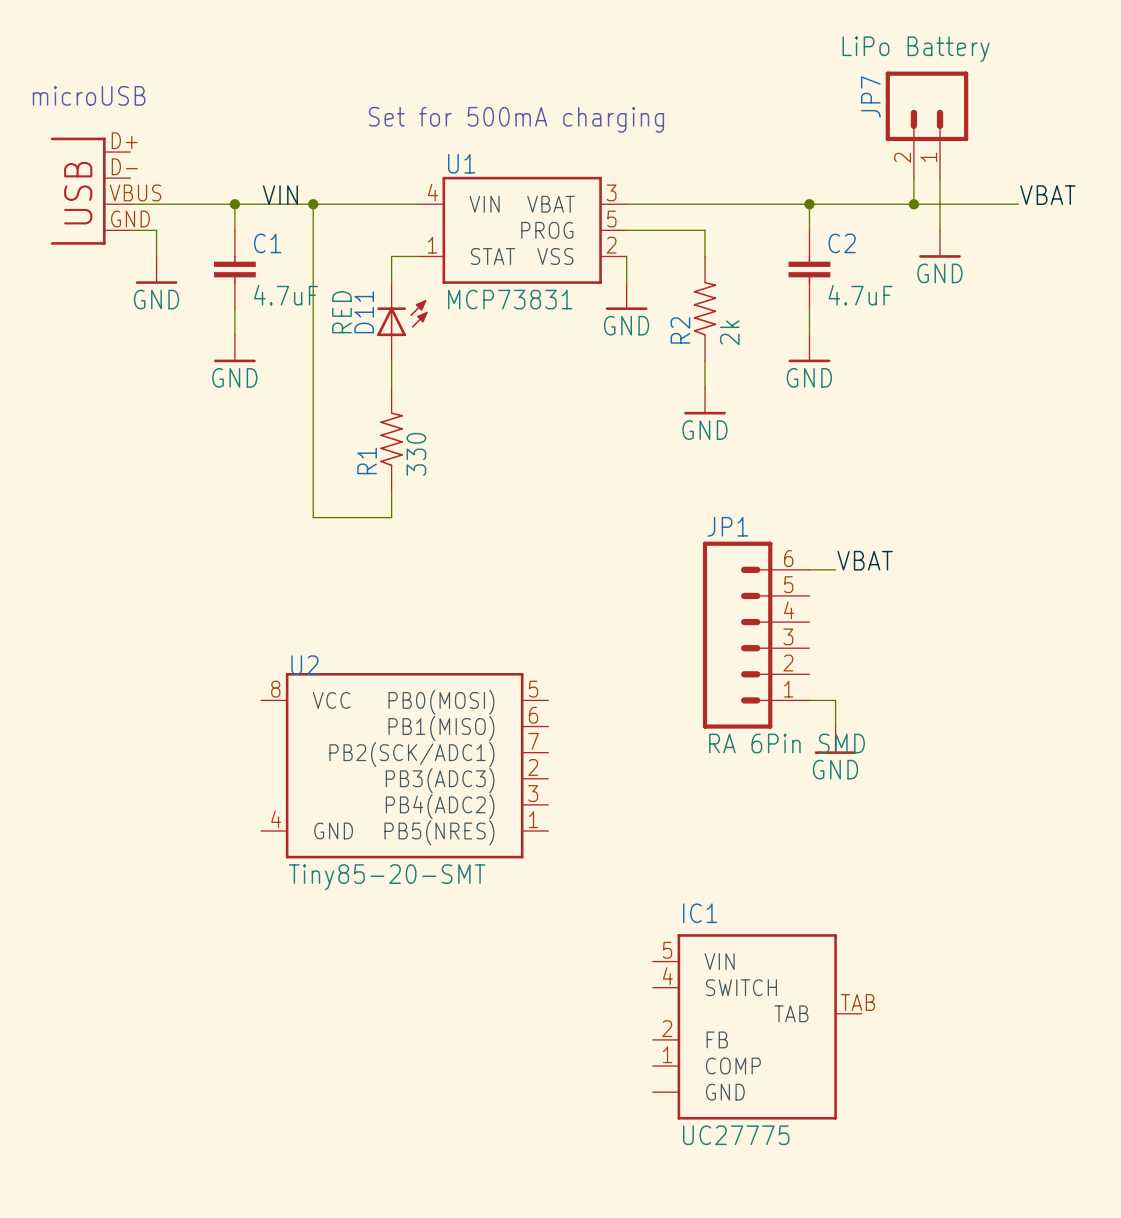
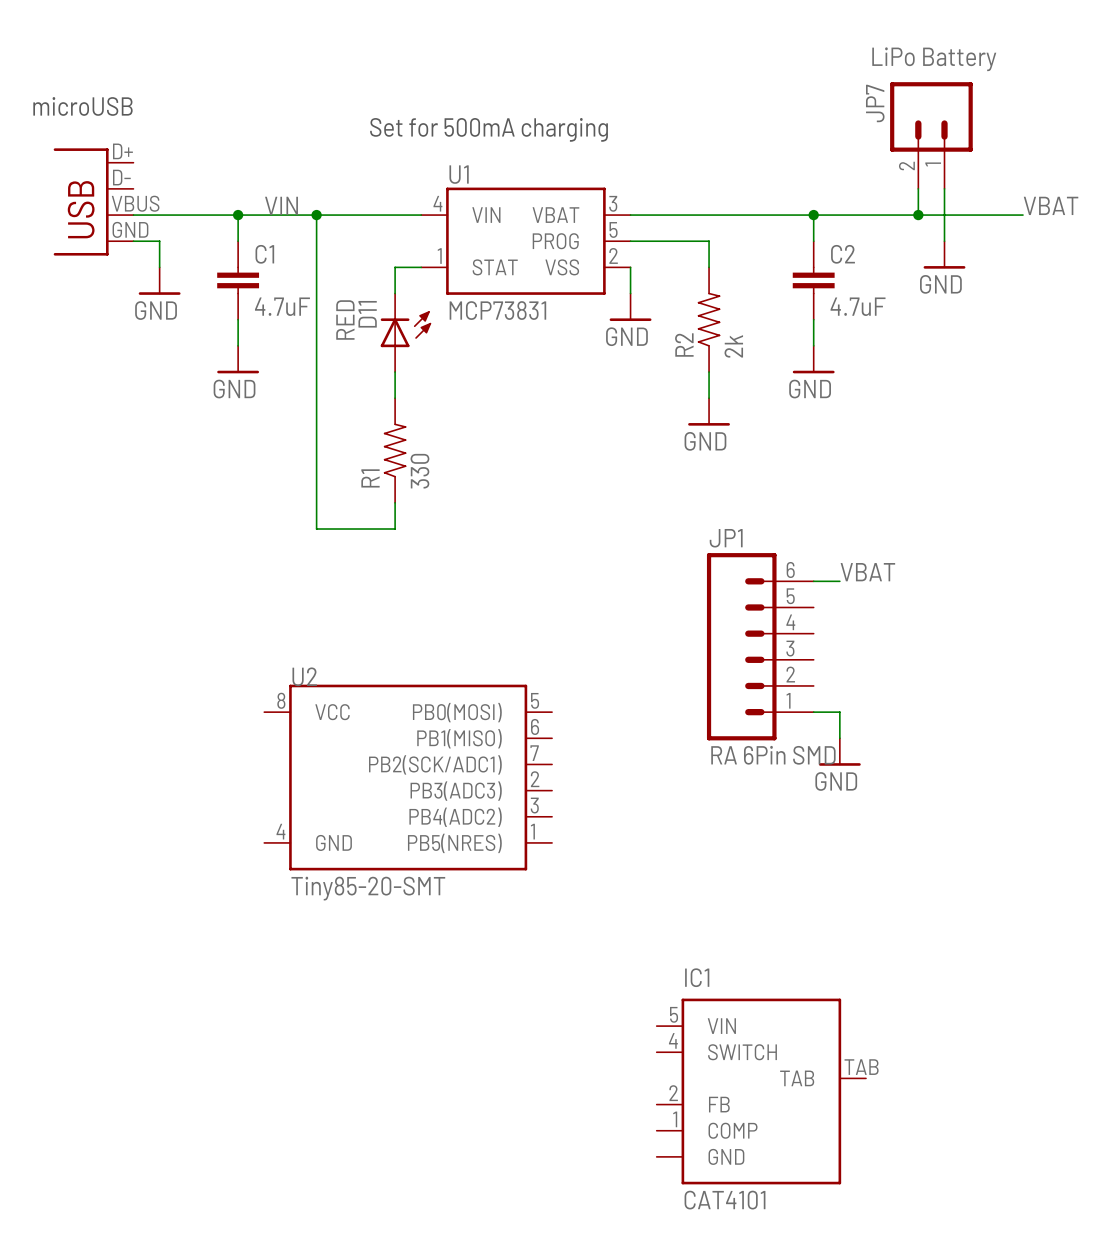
IC1 position: (757, 1026) -> (761, 1091)
IC1 value: UC27775 (736, 1135) -> CAT4101 (725, 1200)

